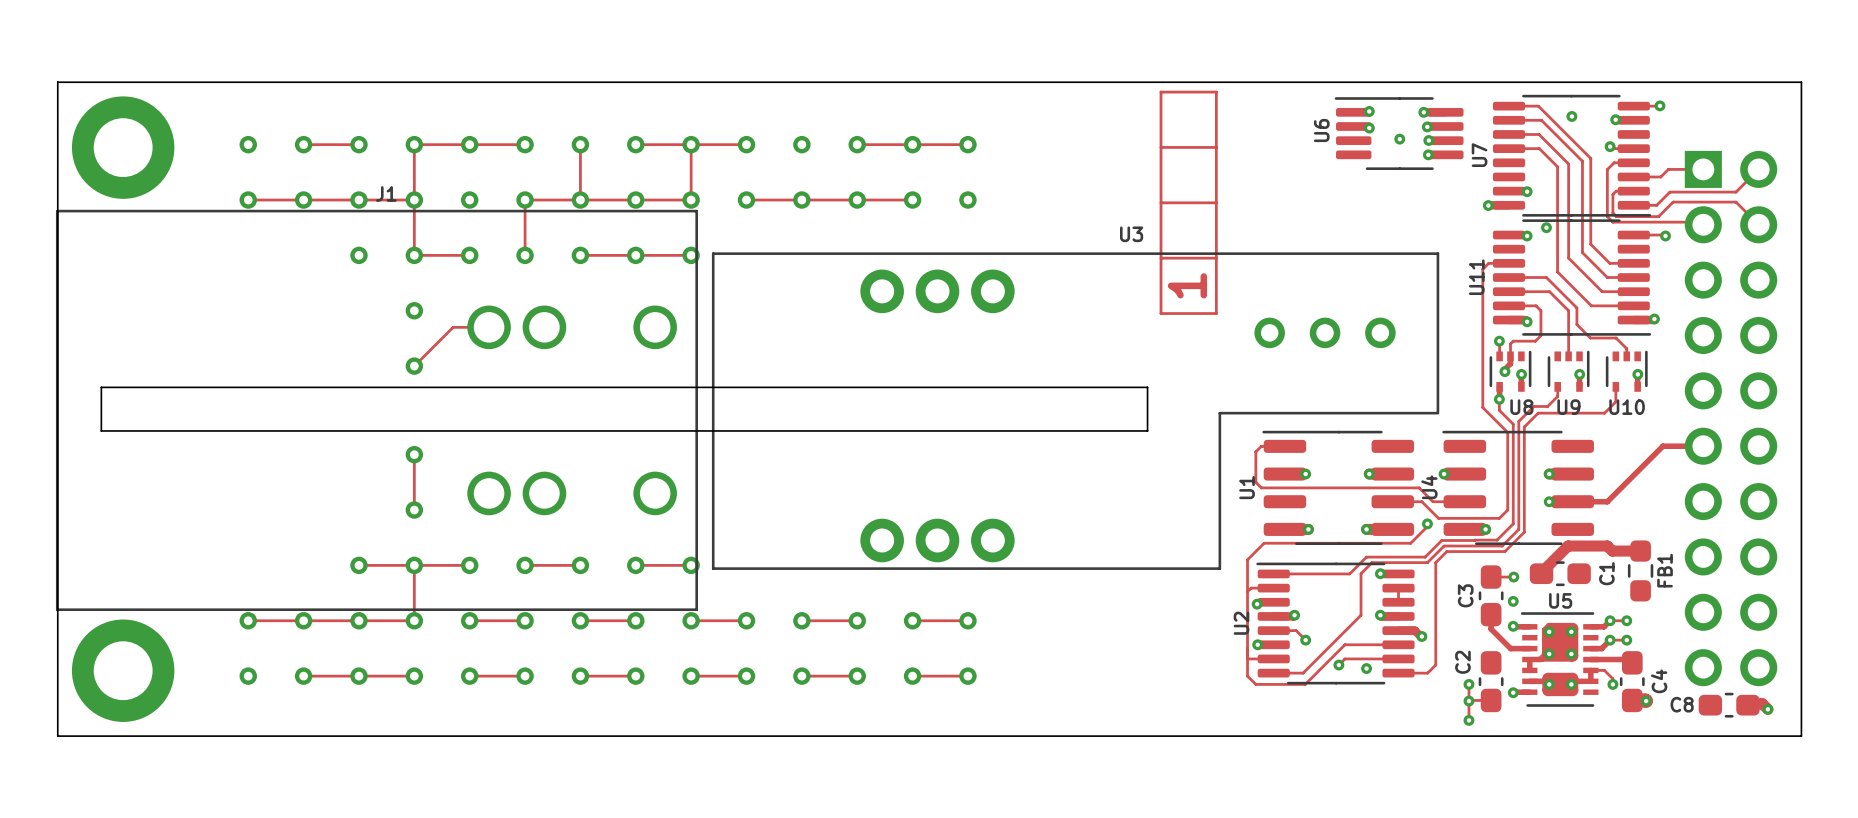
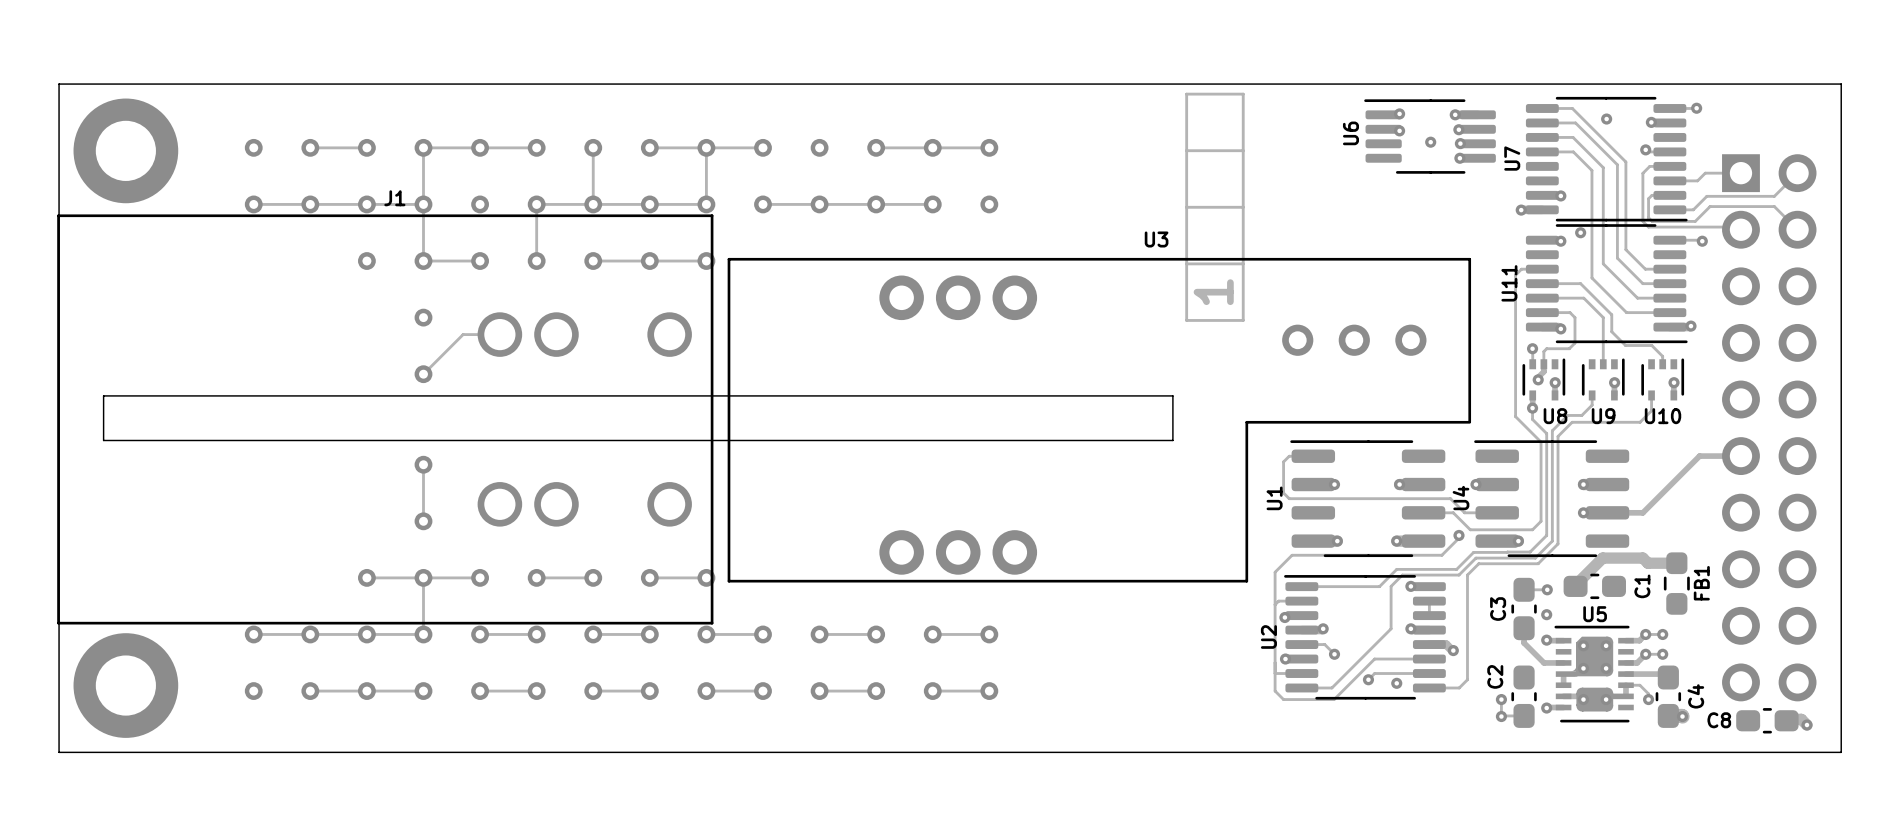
track: (1468, 701) (1468, 720) -> none
via: (1468, 720) -> none

